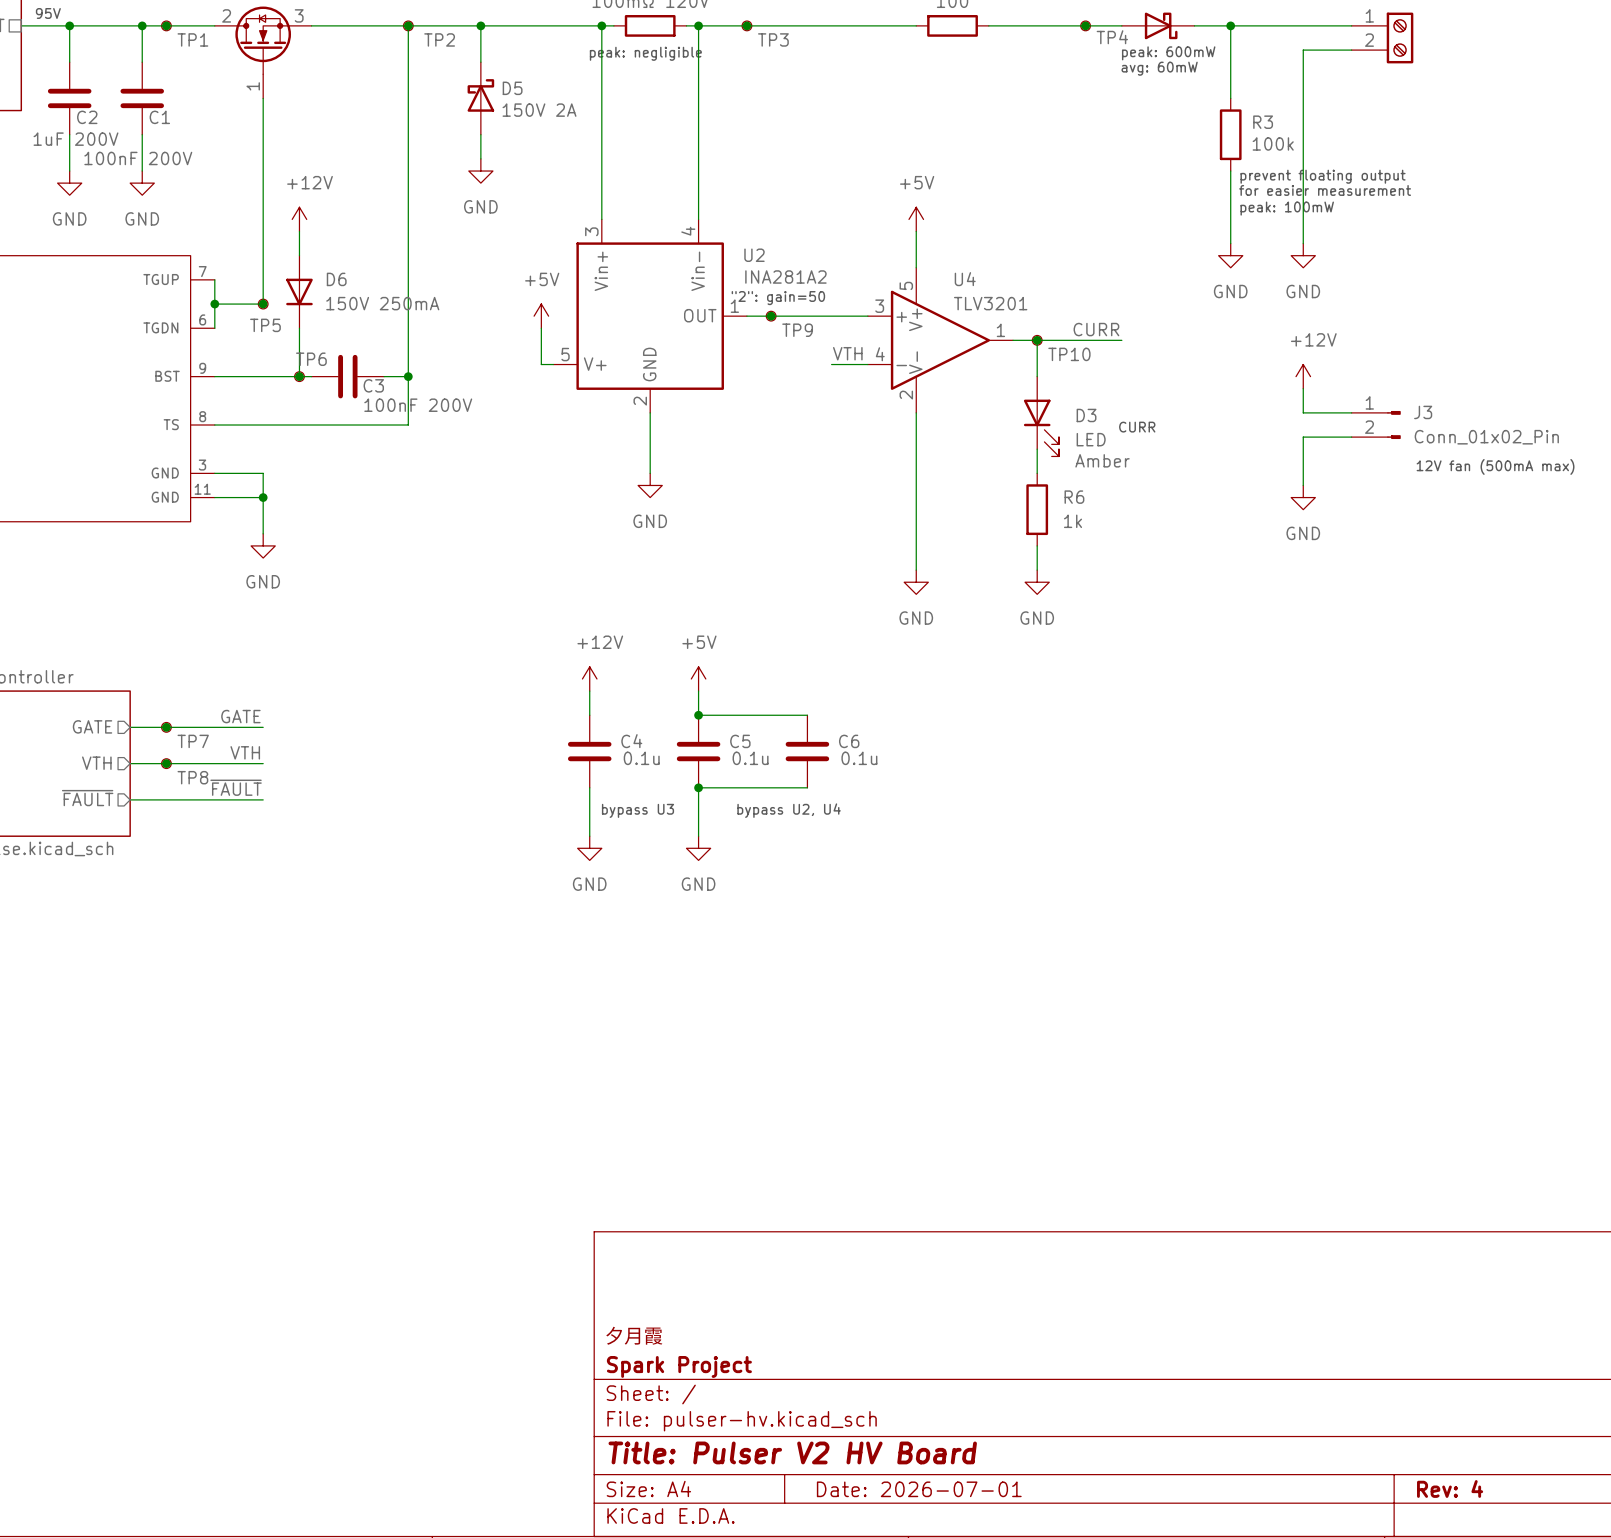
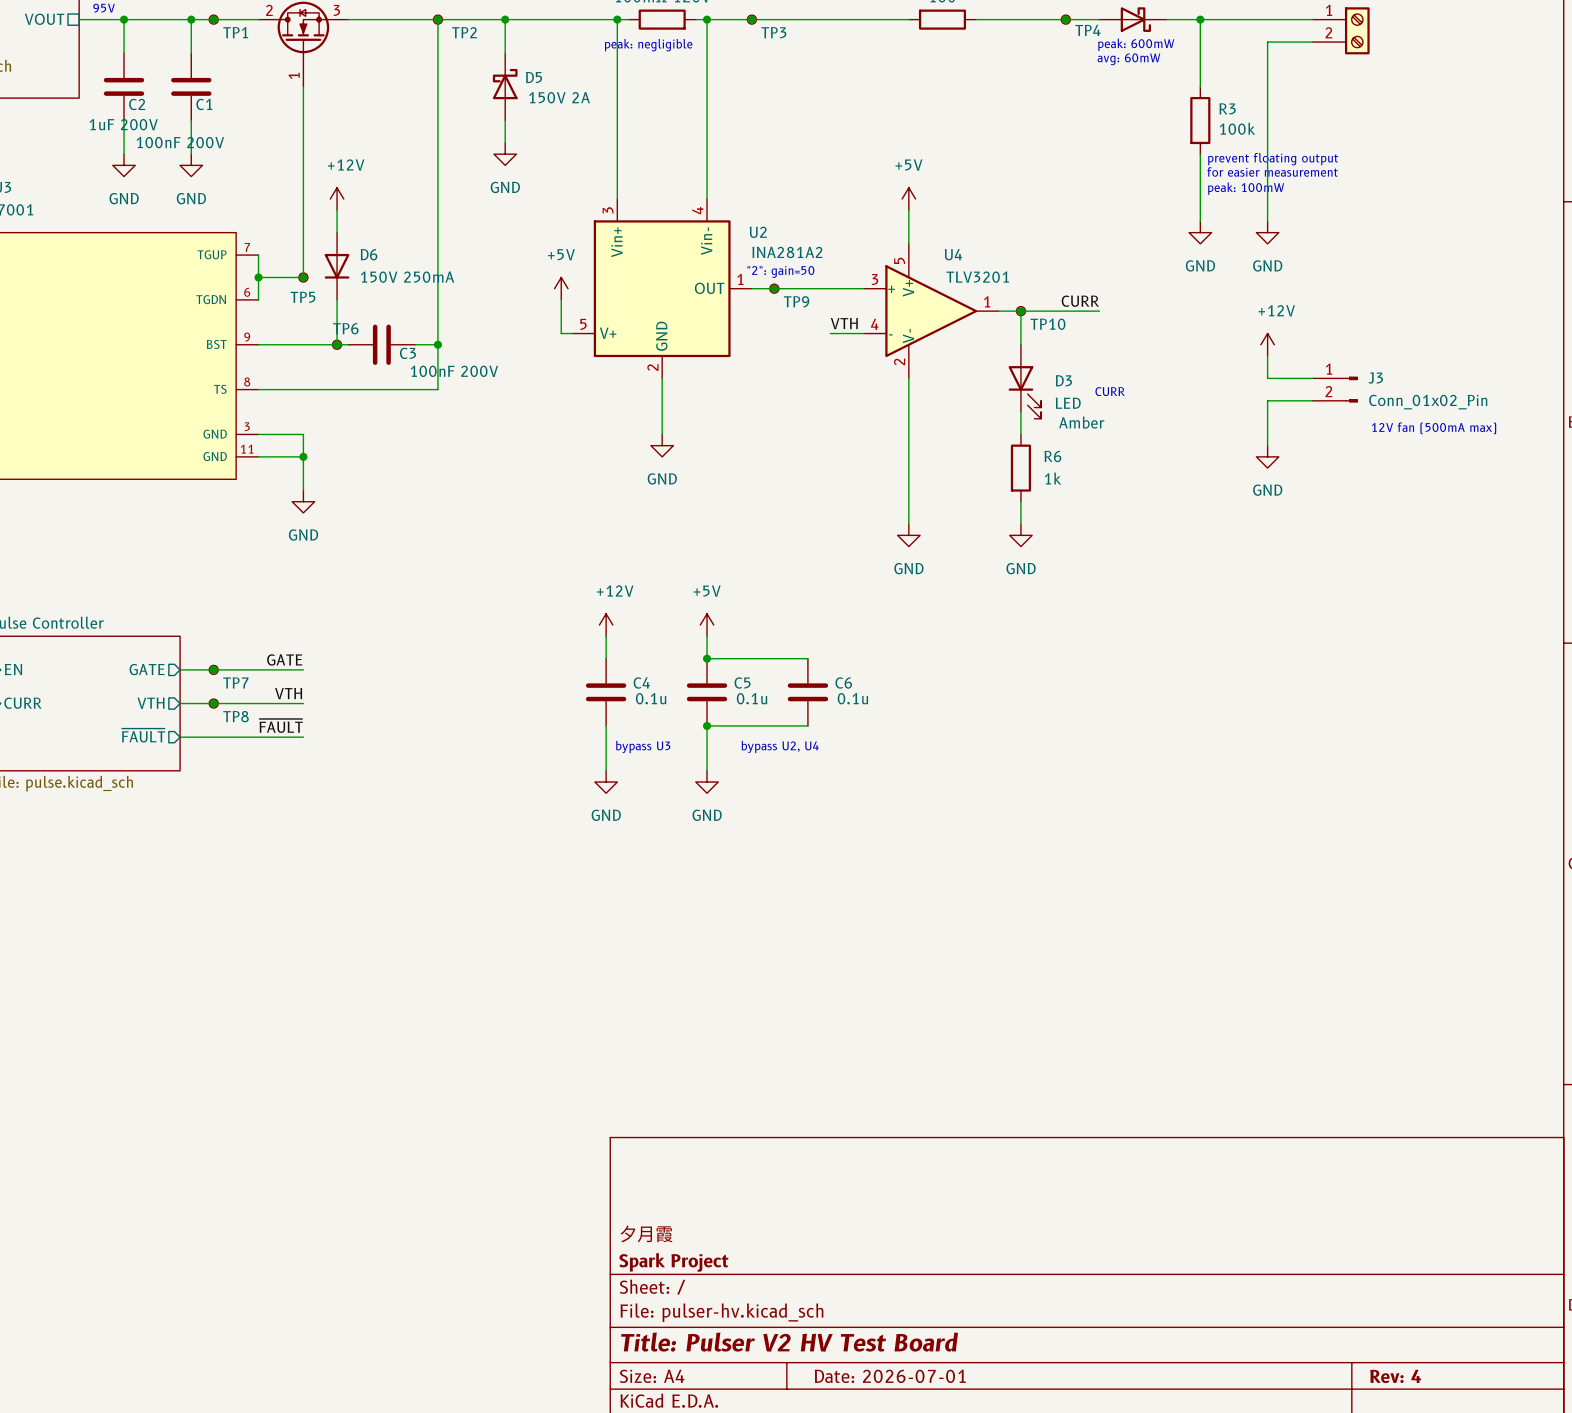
title block: Title: Pulser V2 HV Board (792, 1452) -> Title: Pulser V2 HV Test Board (789, 1342)

